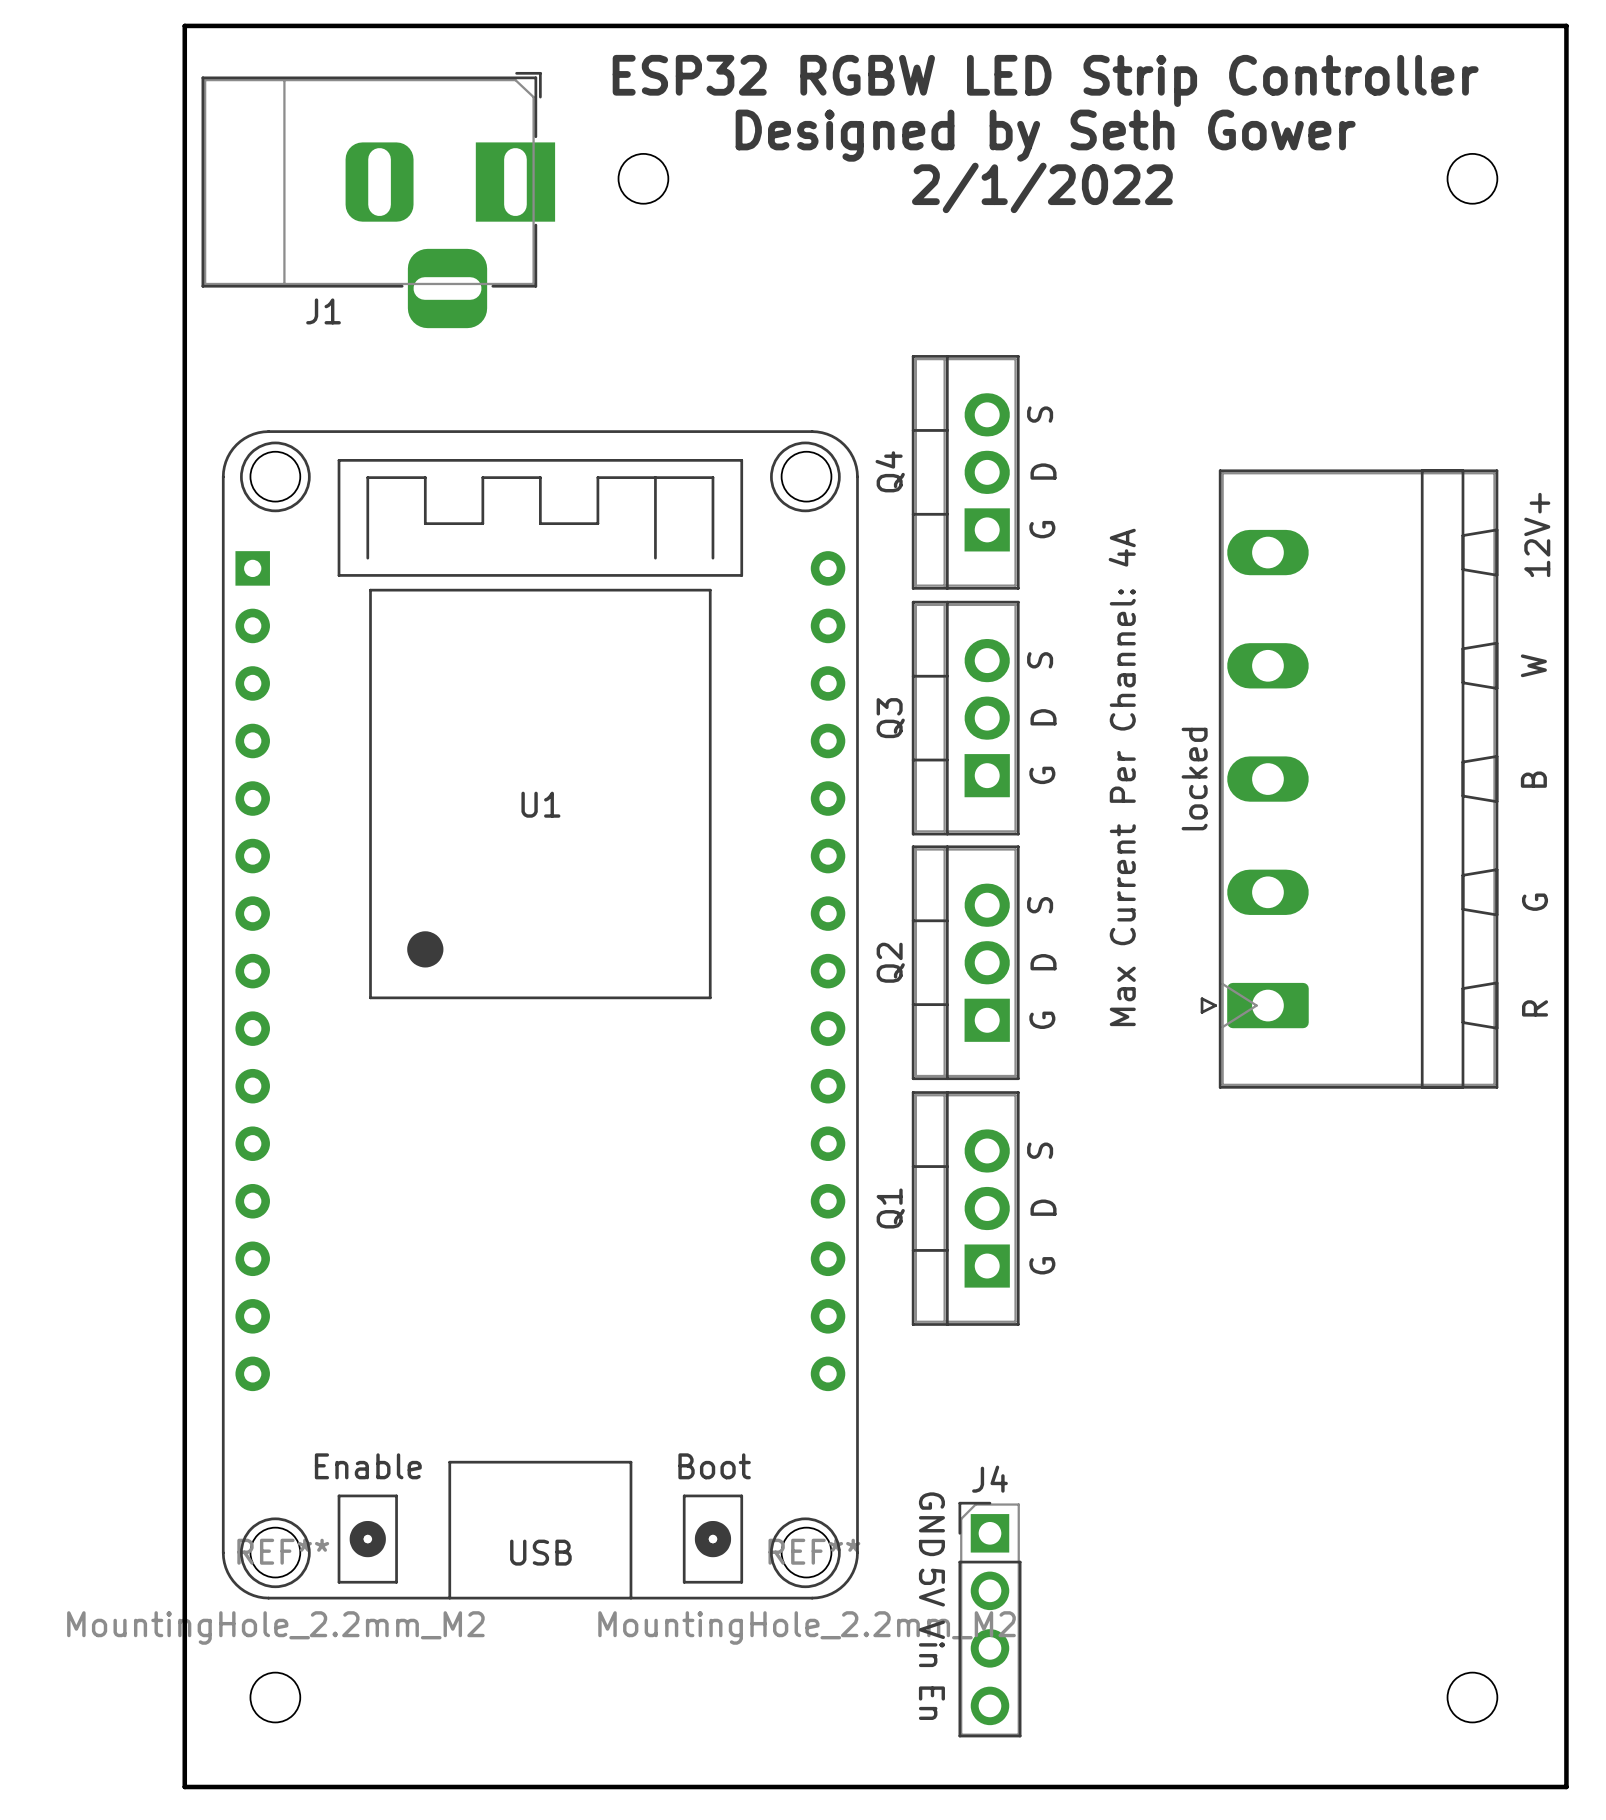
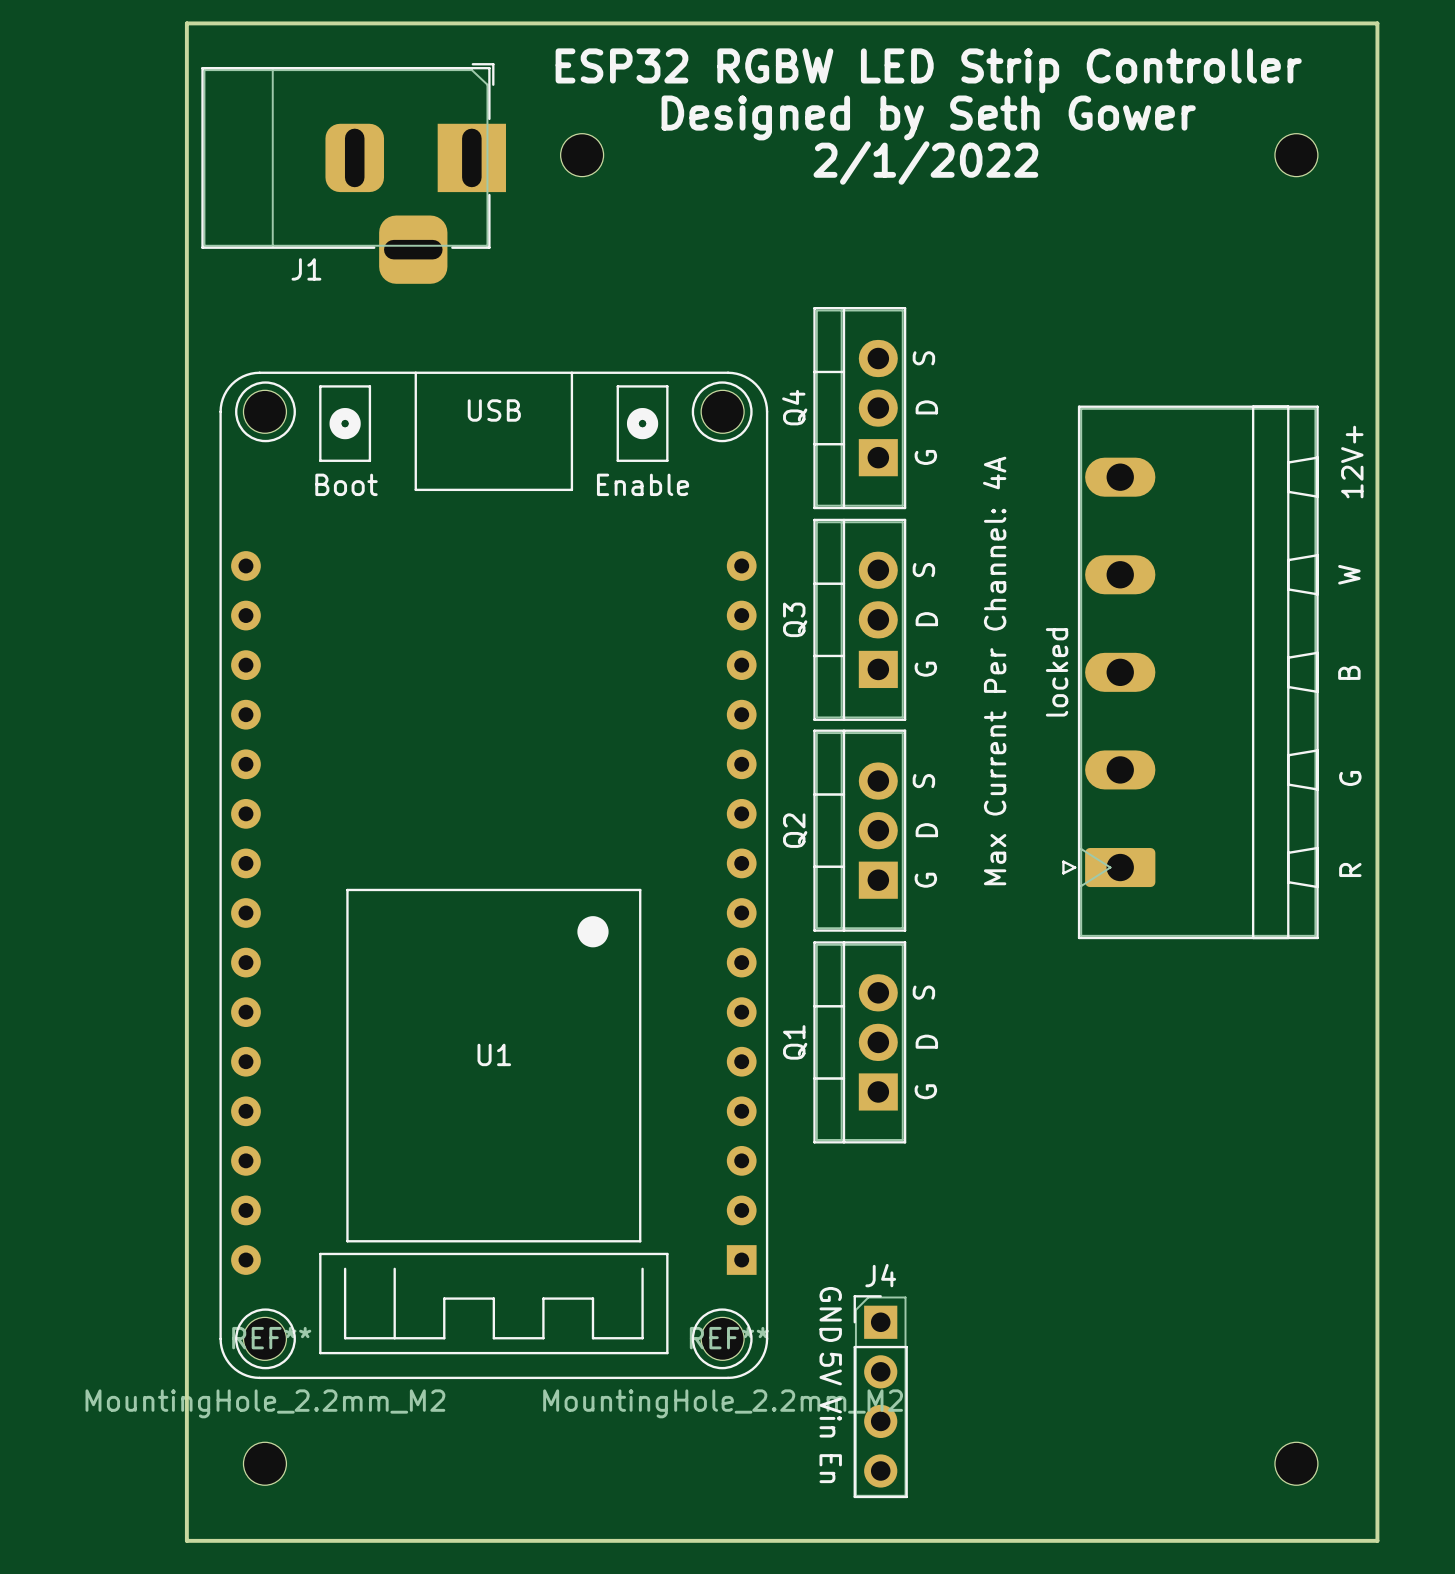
U1 rotation: 0° (540, 1014) -> 180° (493, 875)

